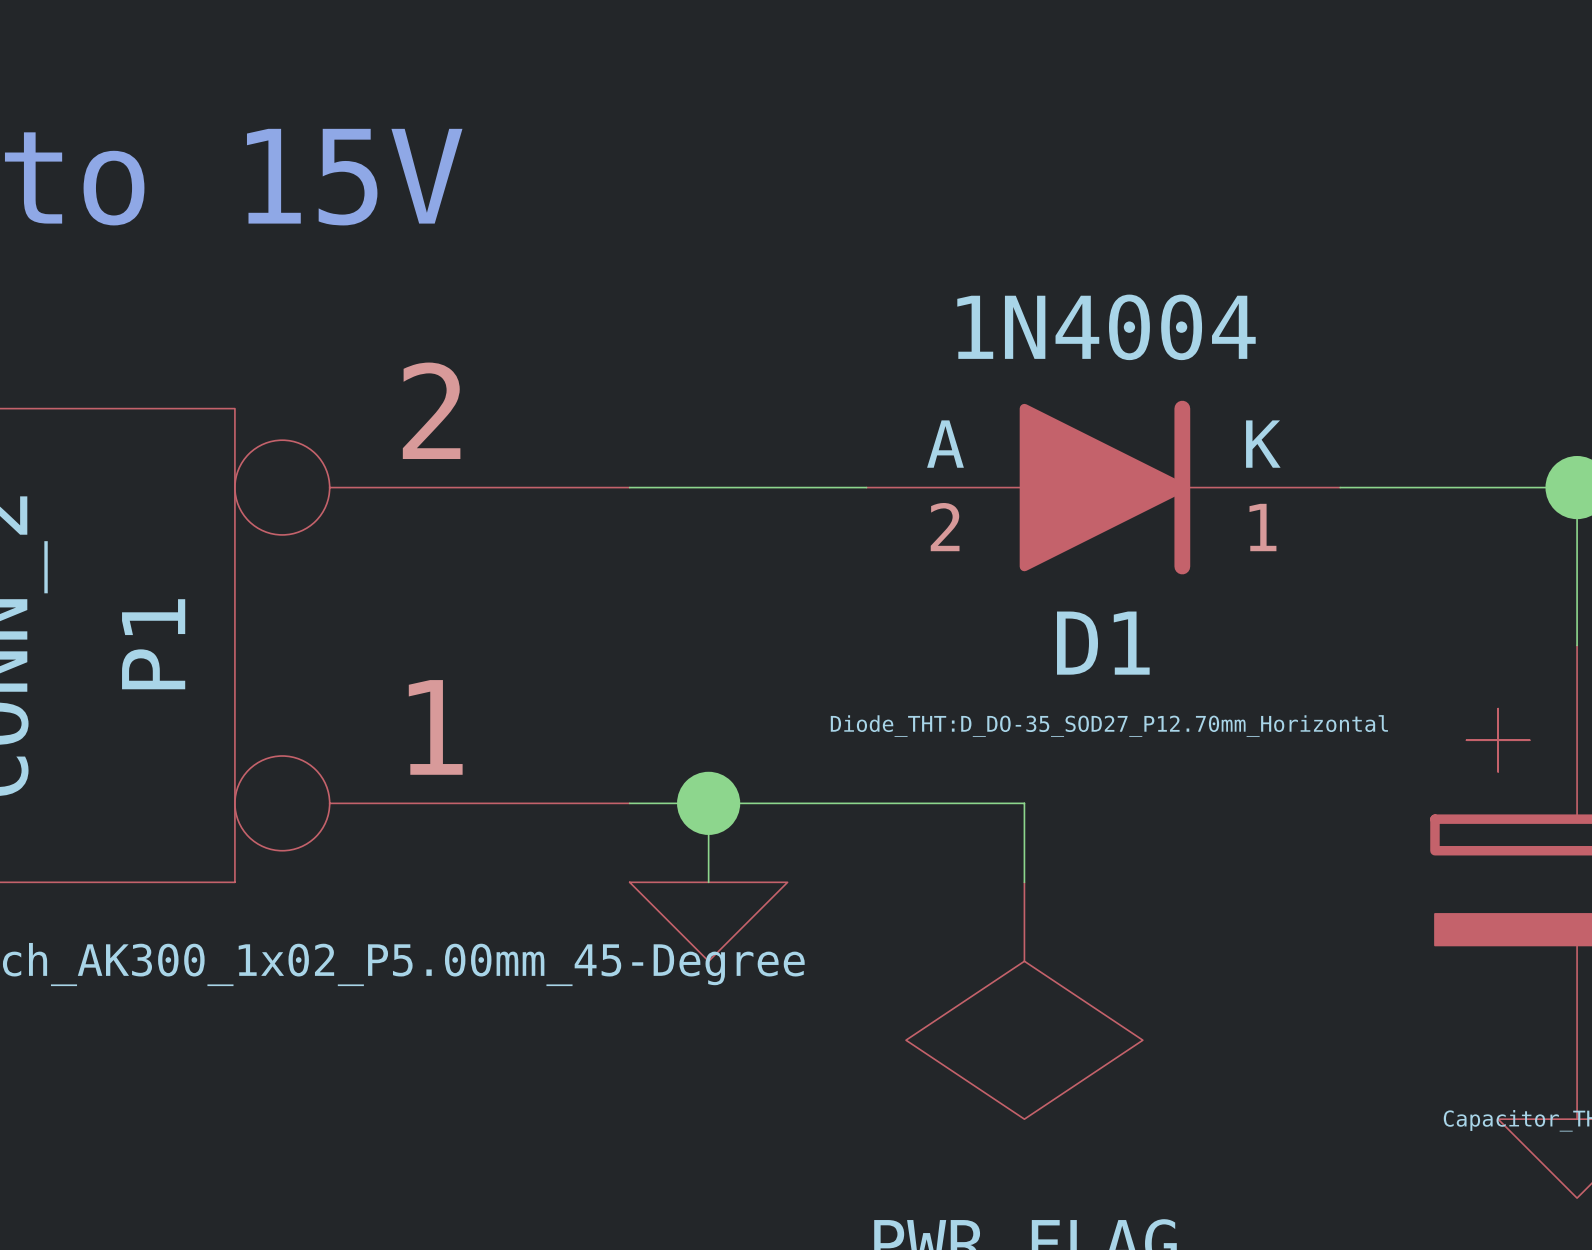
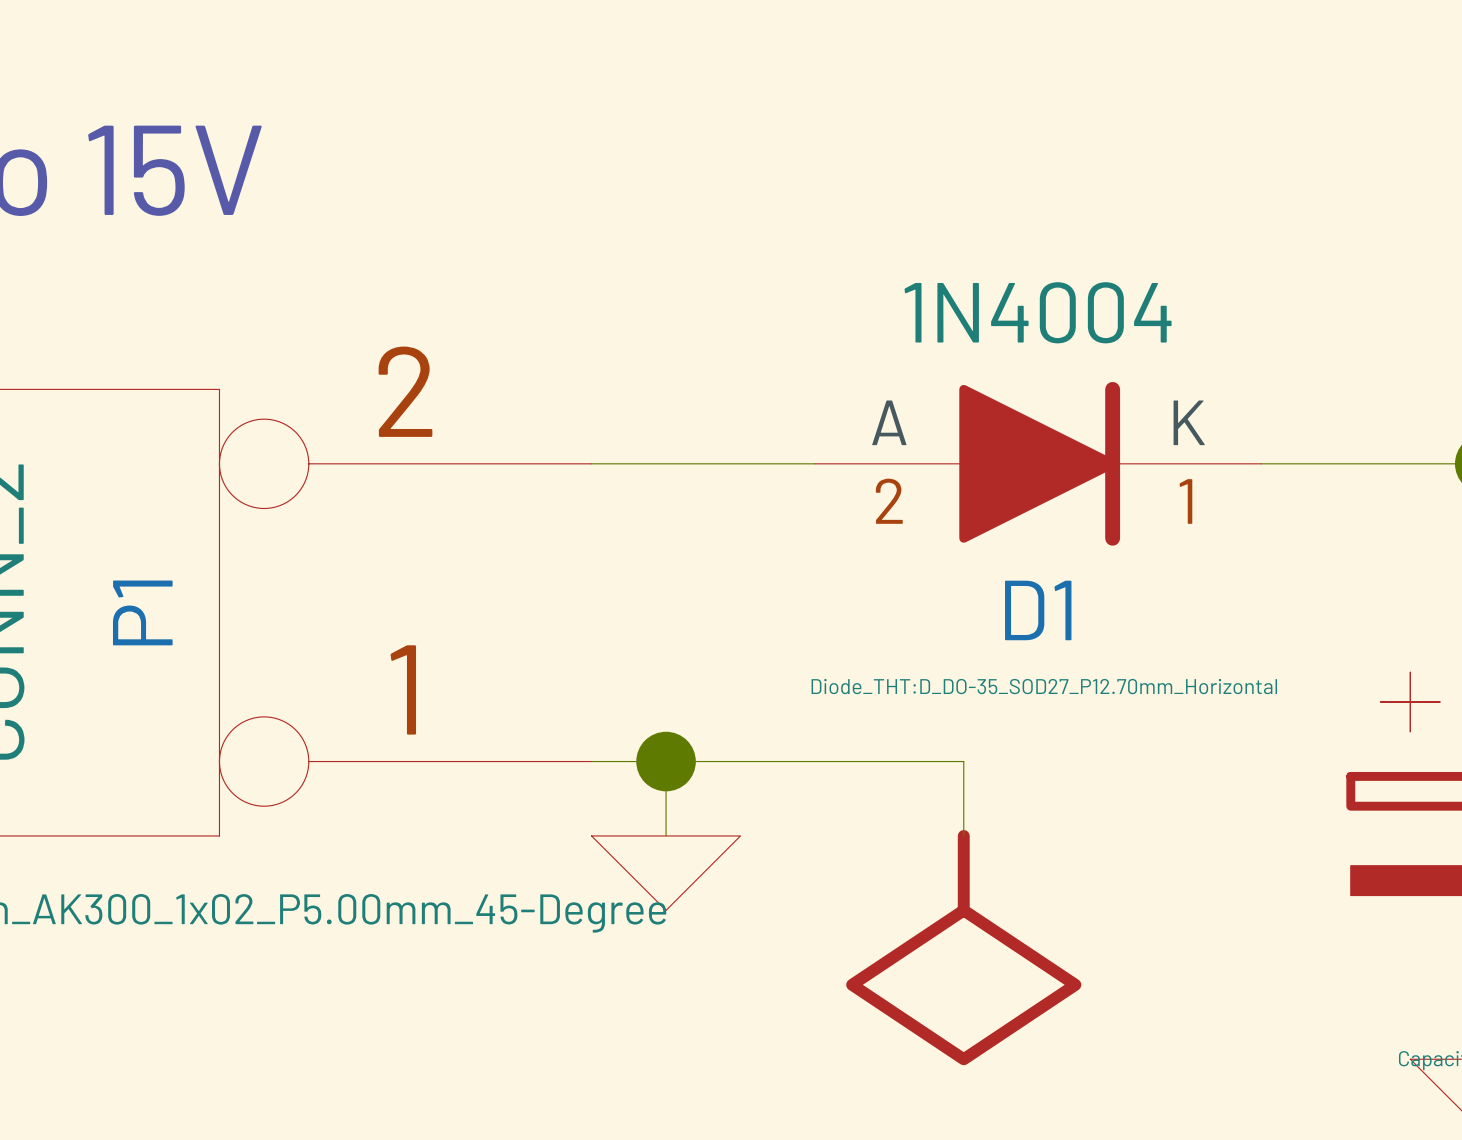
power symbol shape: [906, 882, 1143, 1120] -> [846, 830, 1082, 1066]

